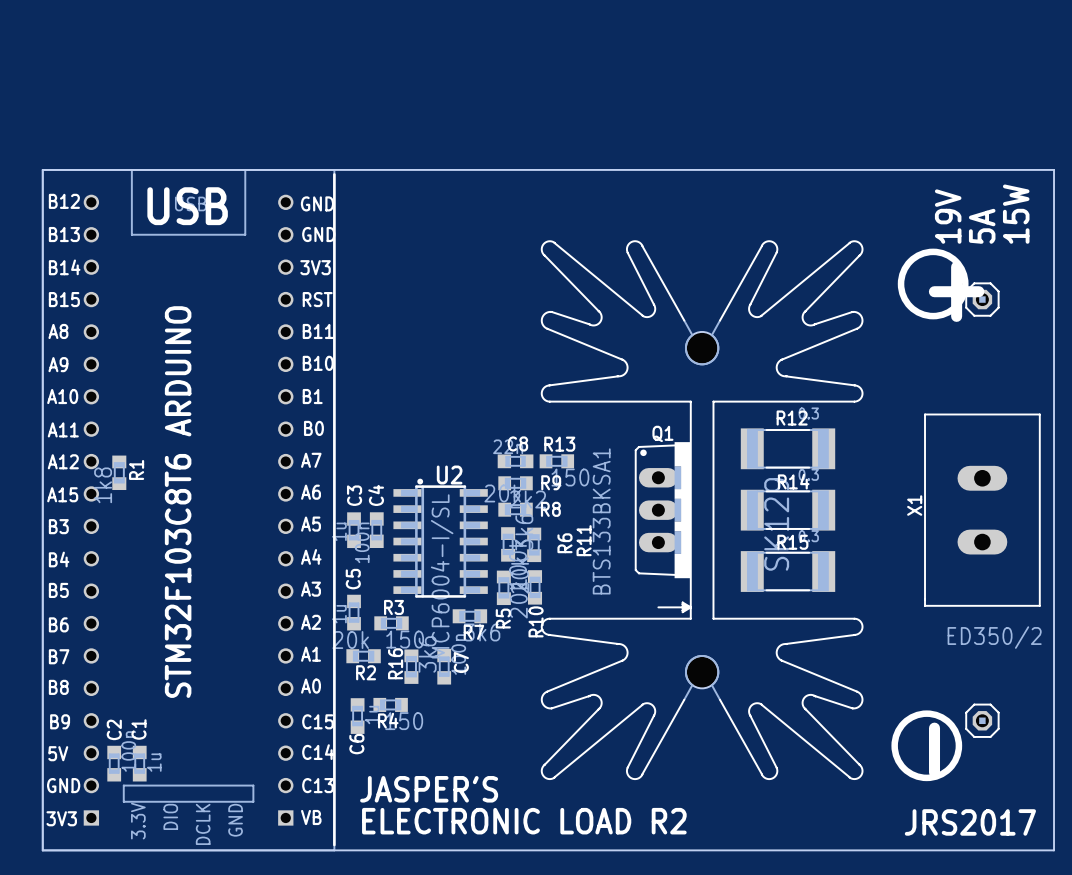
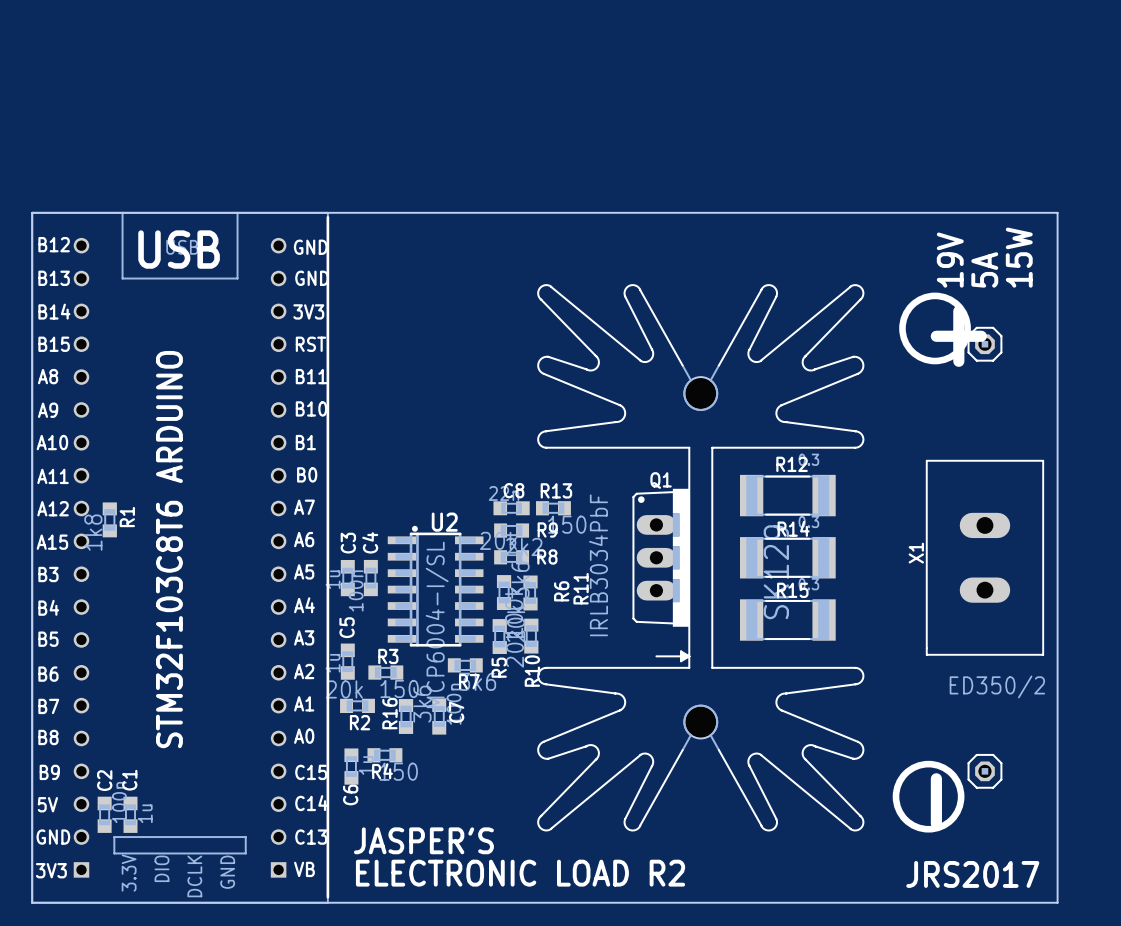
Q1 value: BTS133BKSA1 (601, 521) -> IRLB3034PbF (598, 565)

